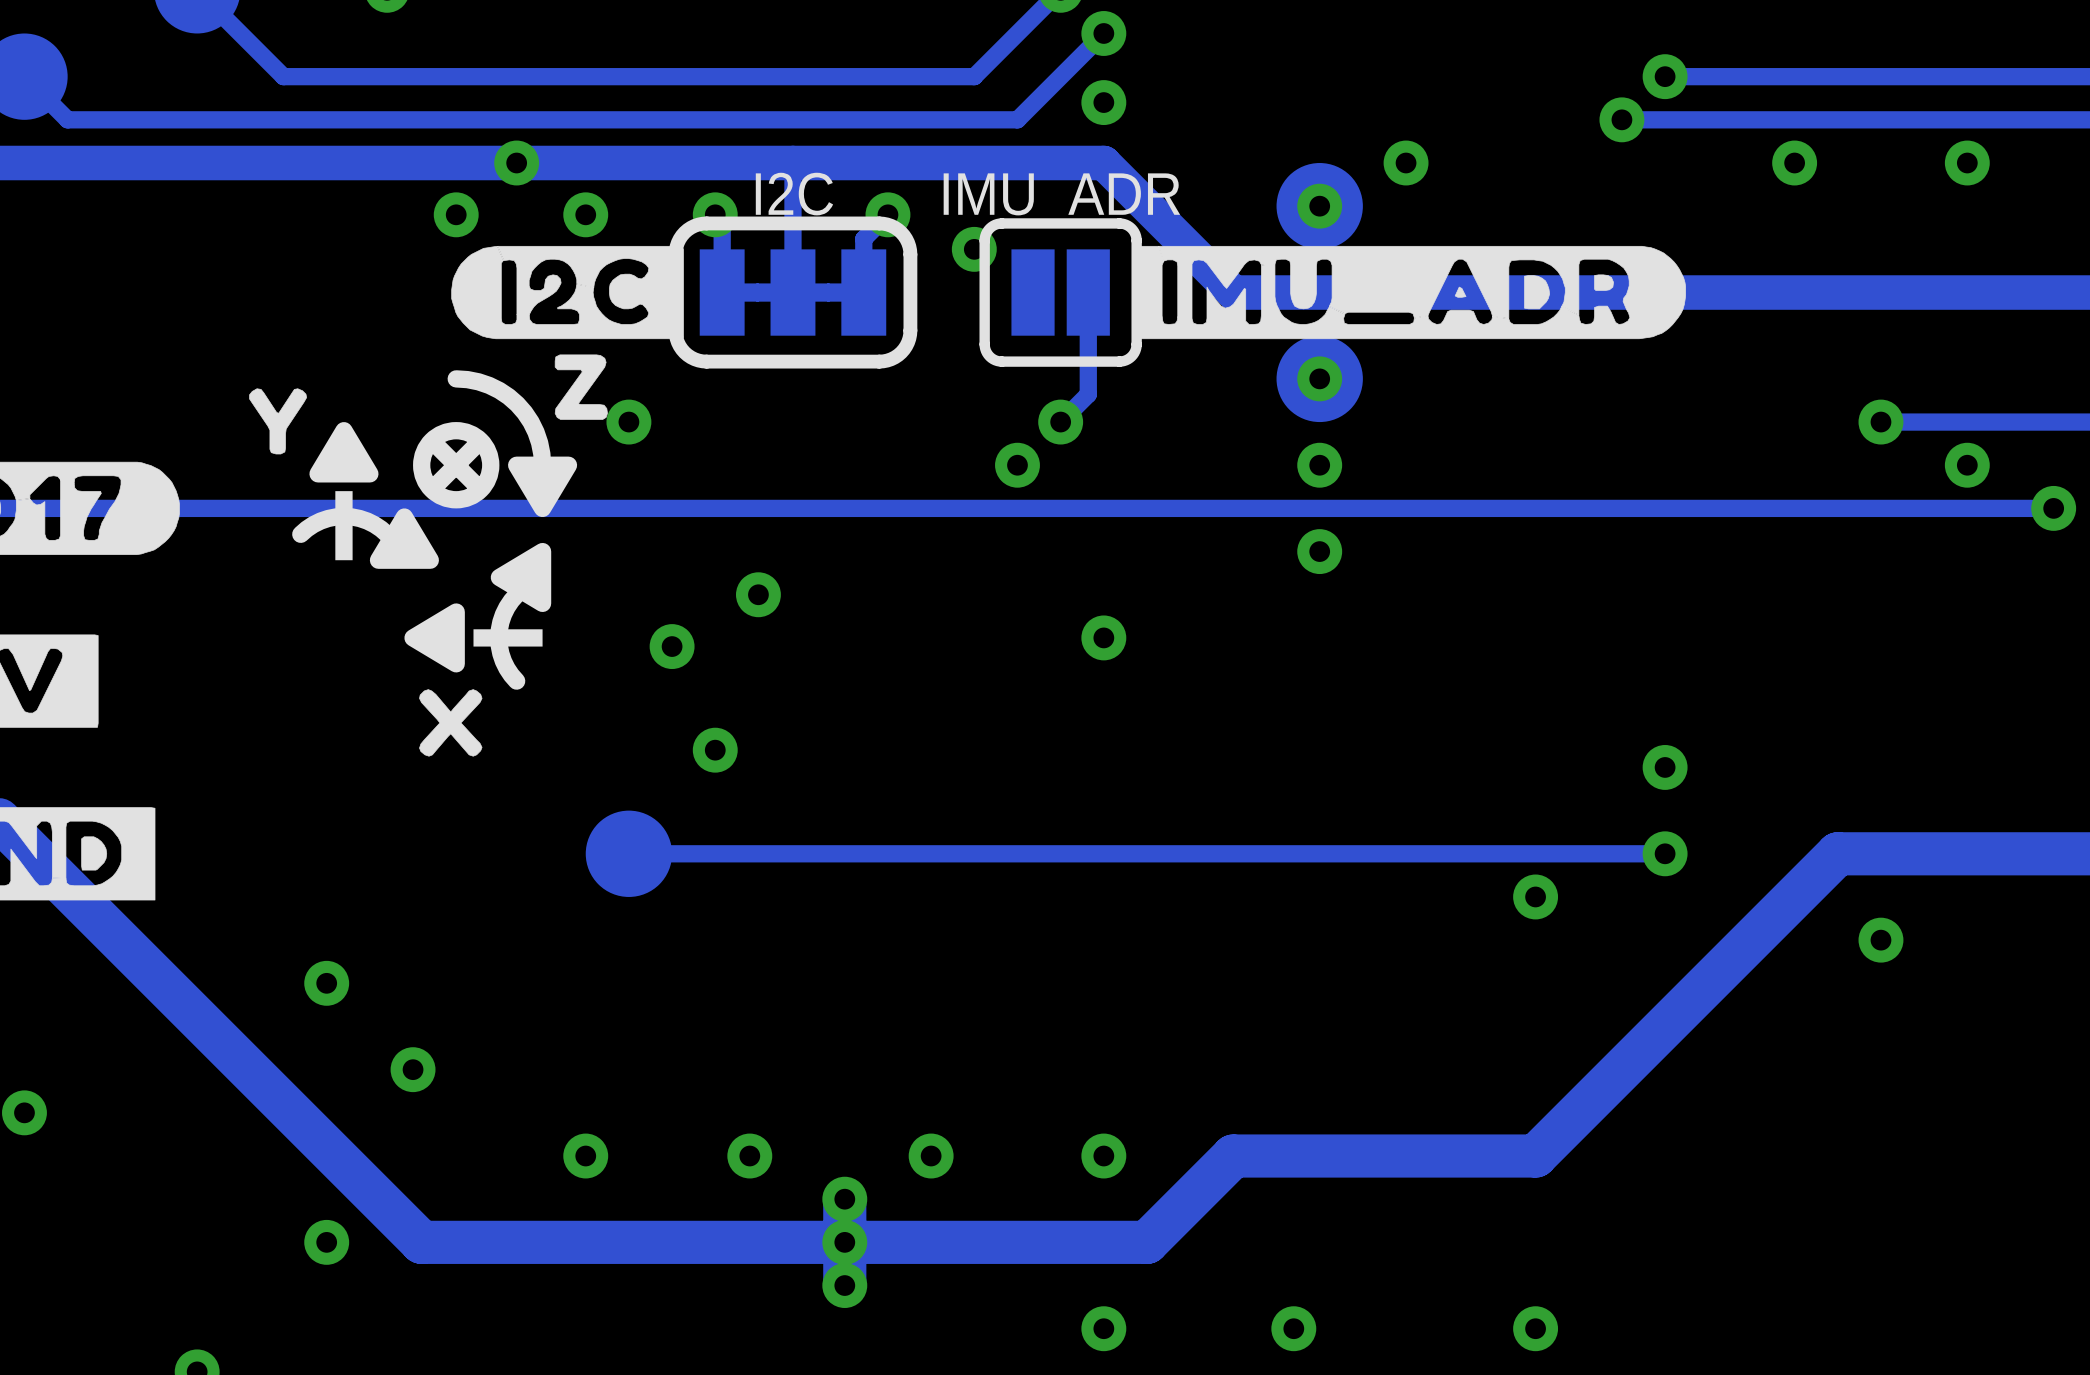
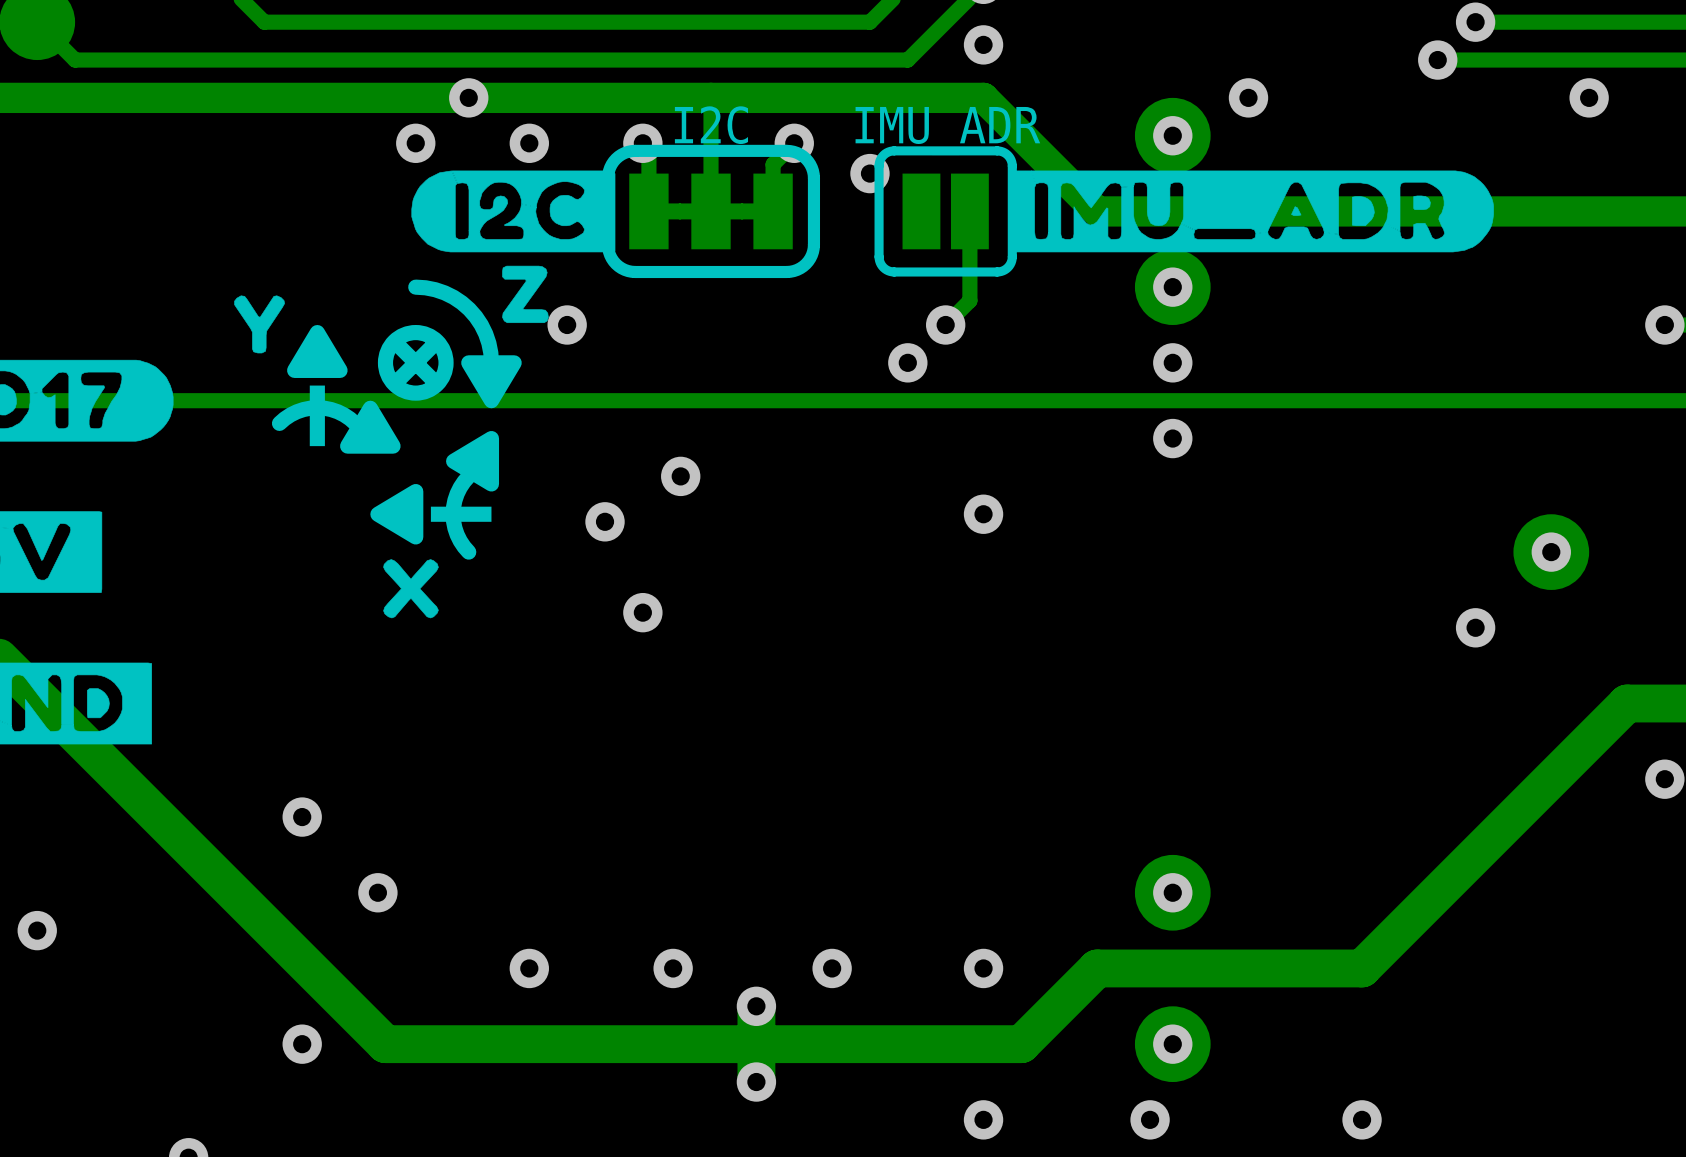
part: none -> (1551, 552)
via: none -> (1551, 552)
part: (628, 853) -> none
track: (1665, 853) (628, 853) -> none
via: (1665, 853) -> none
via: (1535, 896) -> none
part: none -> (1172, 892)
via: none -> (1172, 892)
via: (844, 1242) -> none
part: none -> (1172, 1044)
via: none -> (1172, 1044)

